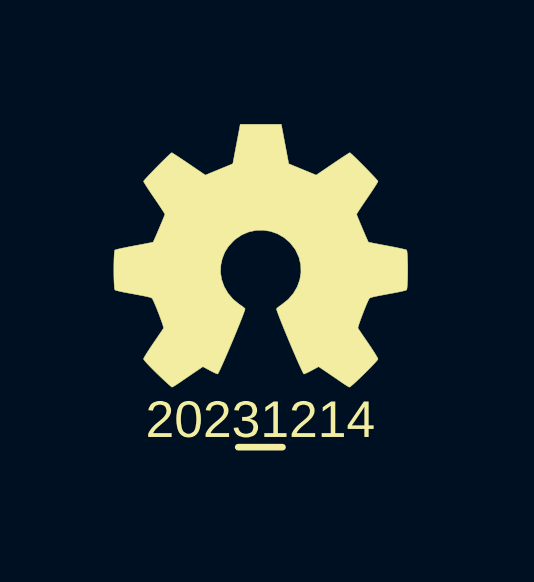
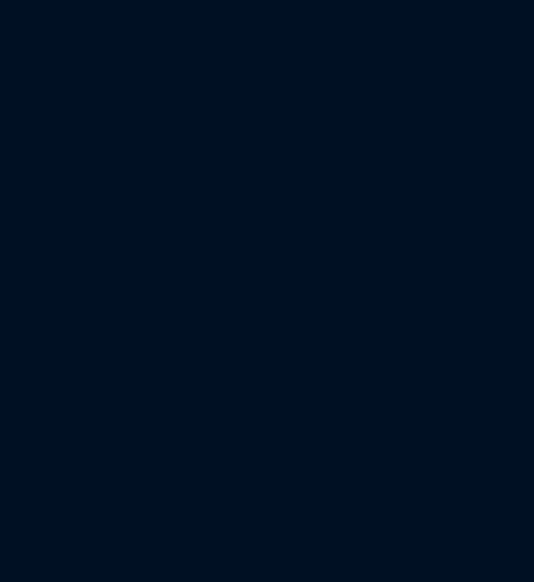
drawing: [113, 124, 408, 451] -> none

